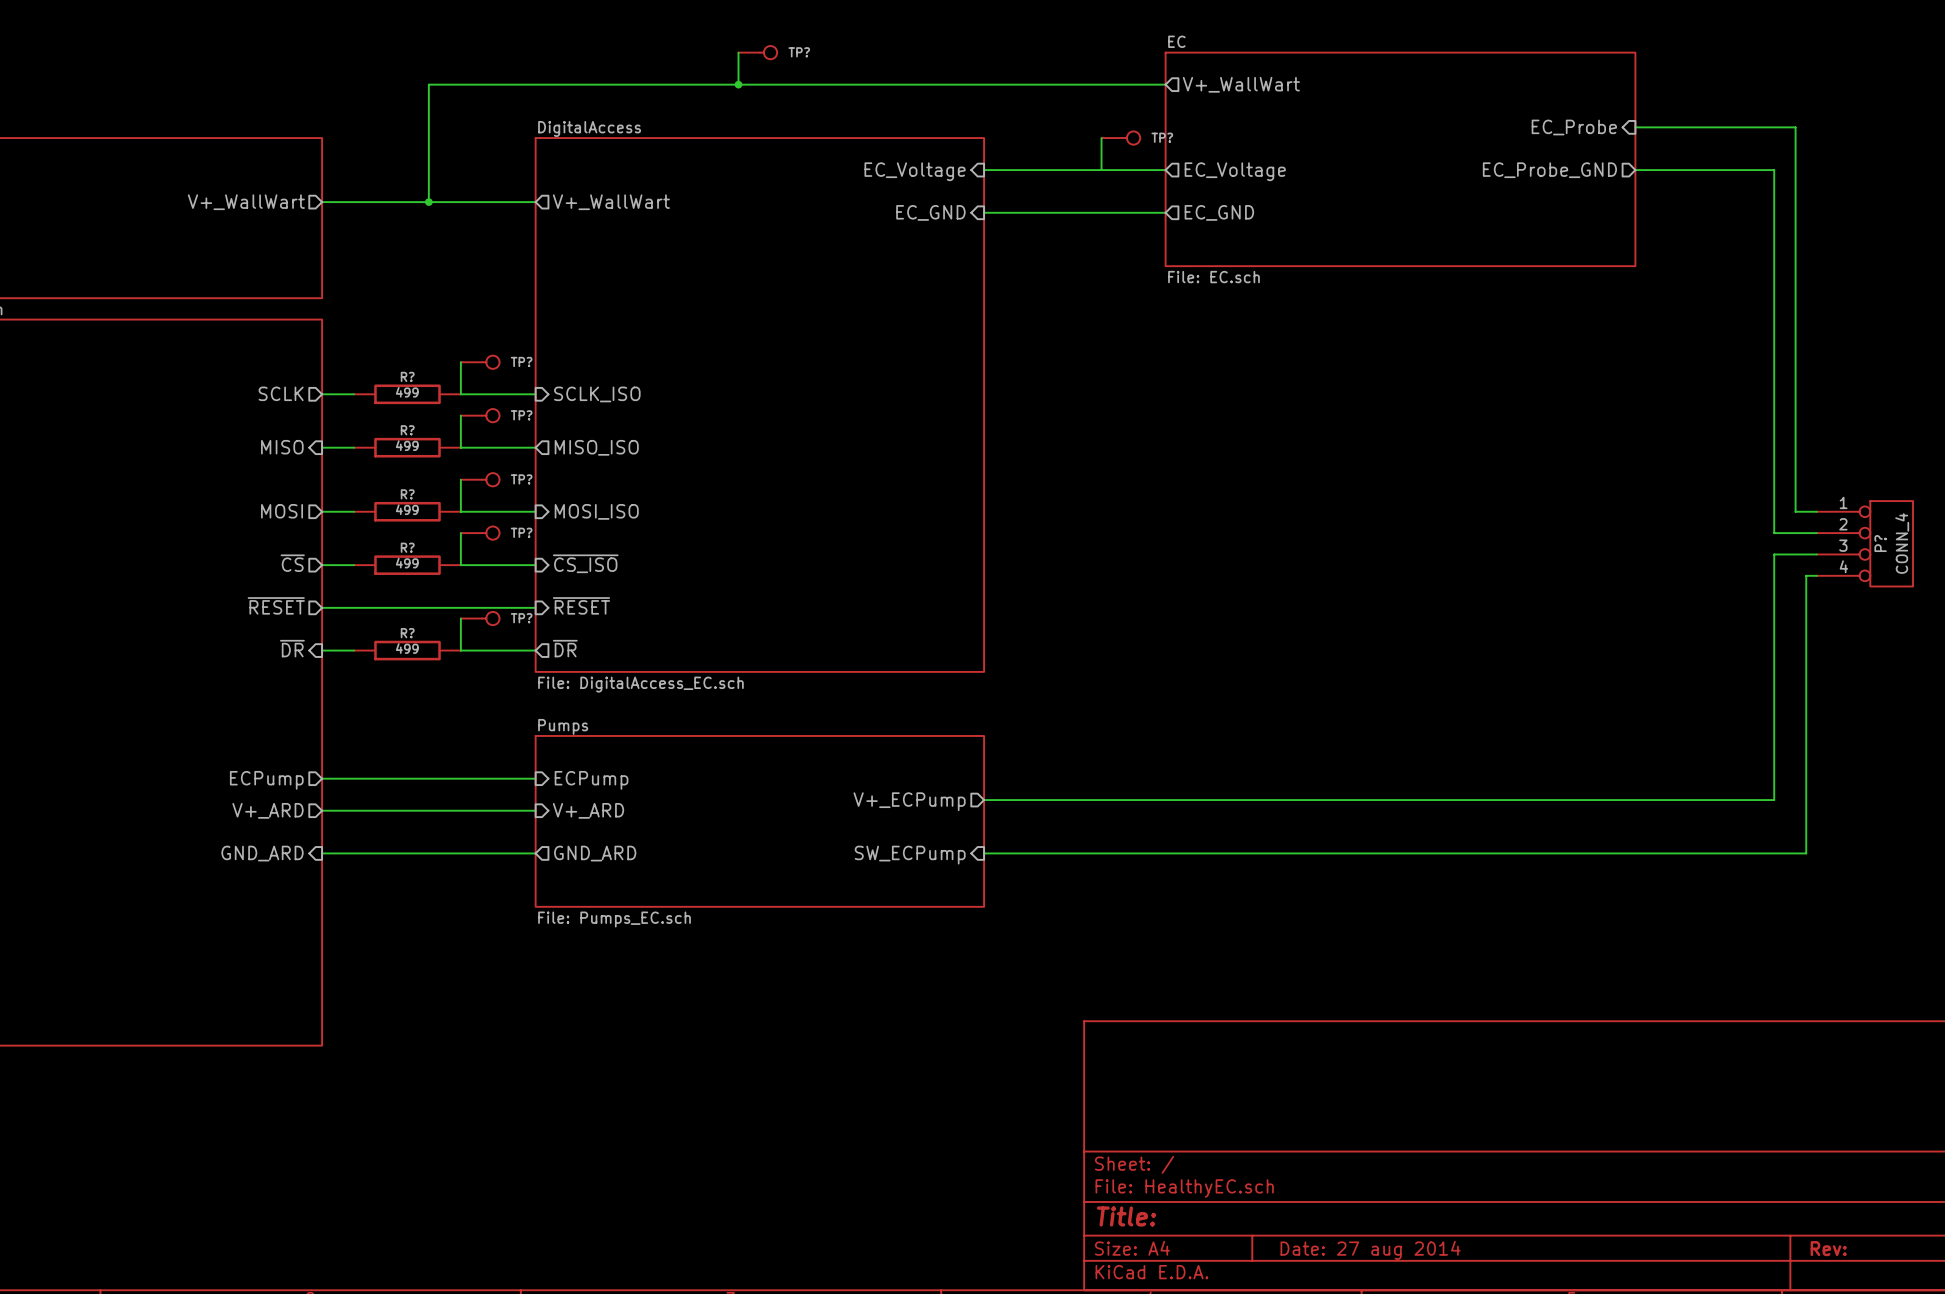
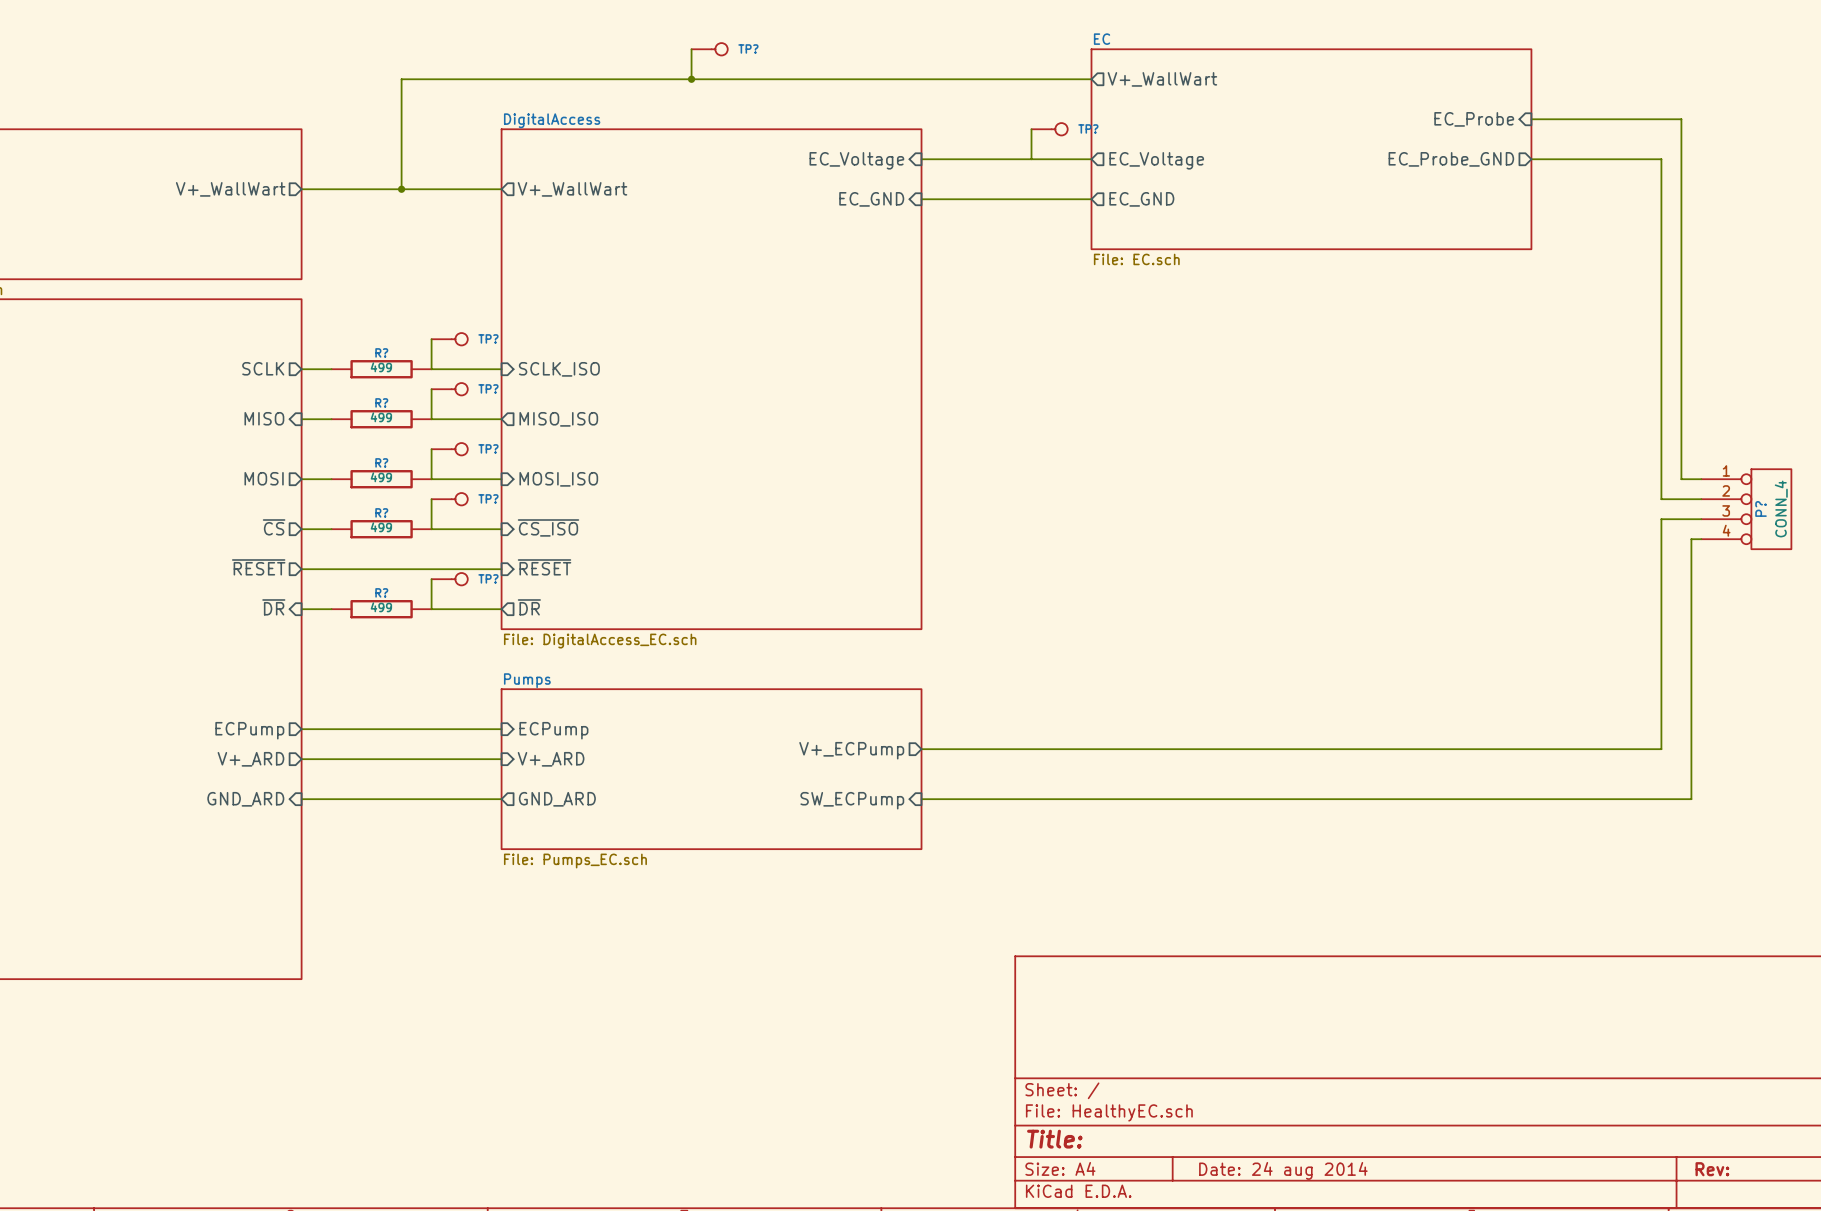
title block: Date: 27 aug 2014 (1370, 1250) -> Date: 24 aug 2014 (1283, 1170)

